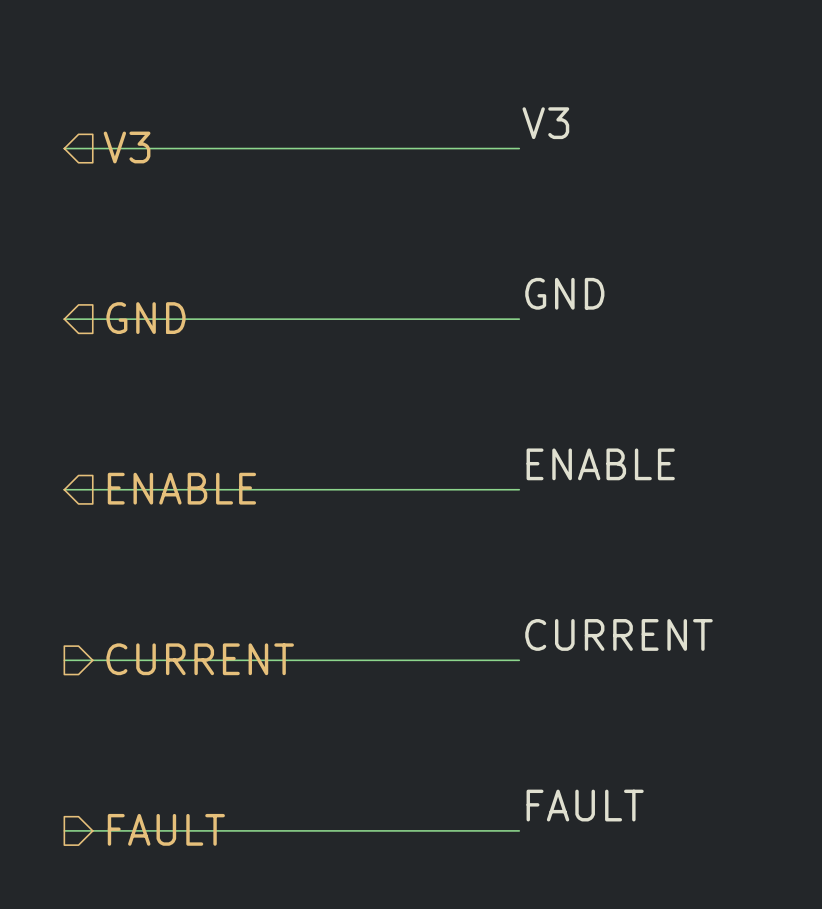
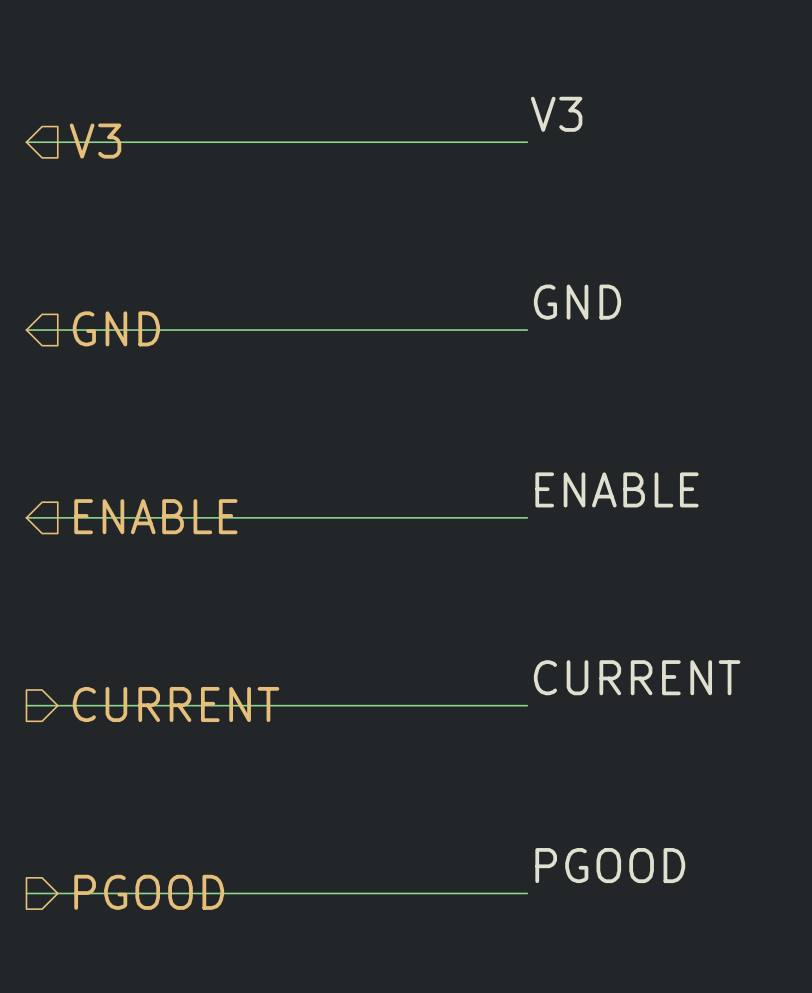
label: FAULT (585, 805) -> PGOOD (610, 865)
hierarchical label: FAULT (166, 829) -> PGOOD (149, 892)

